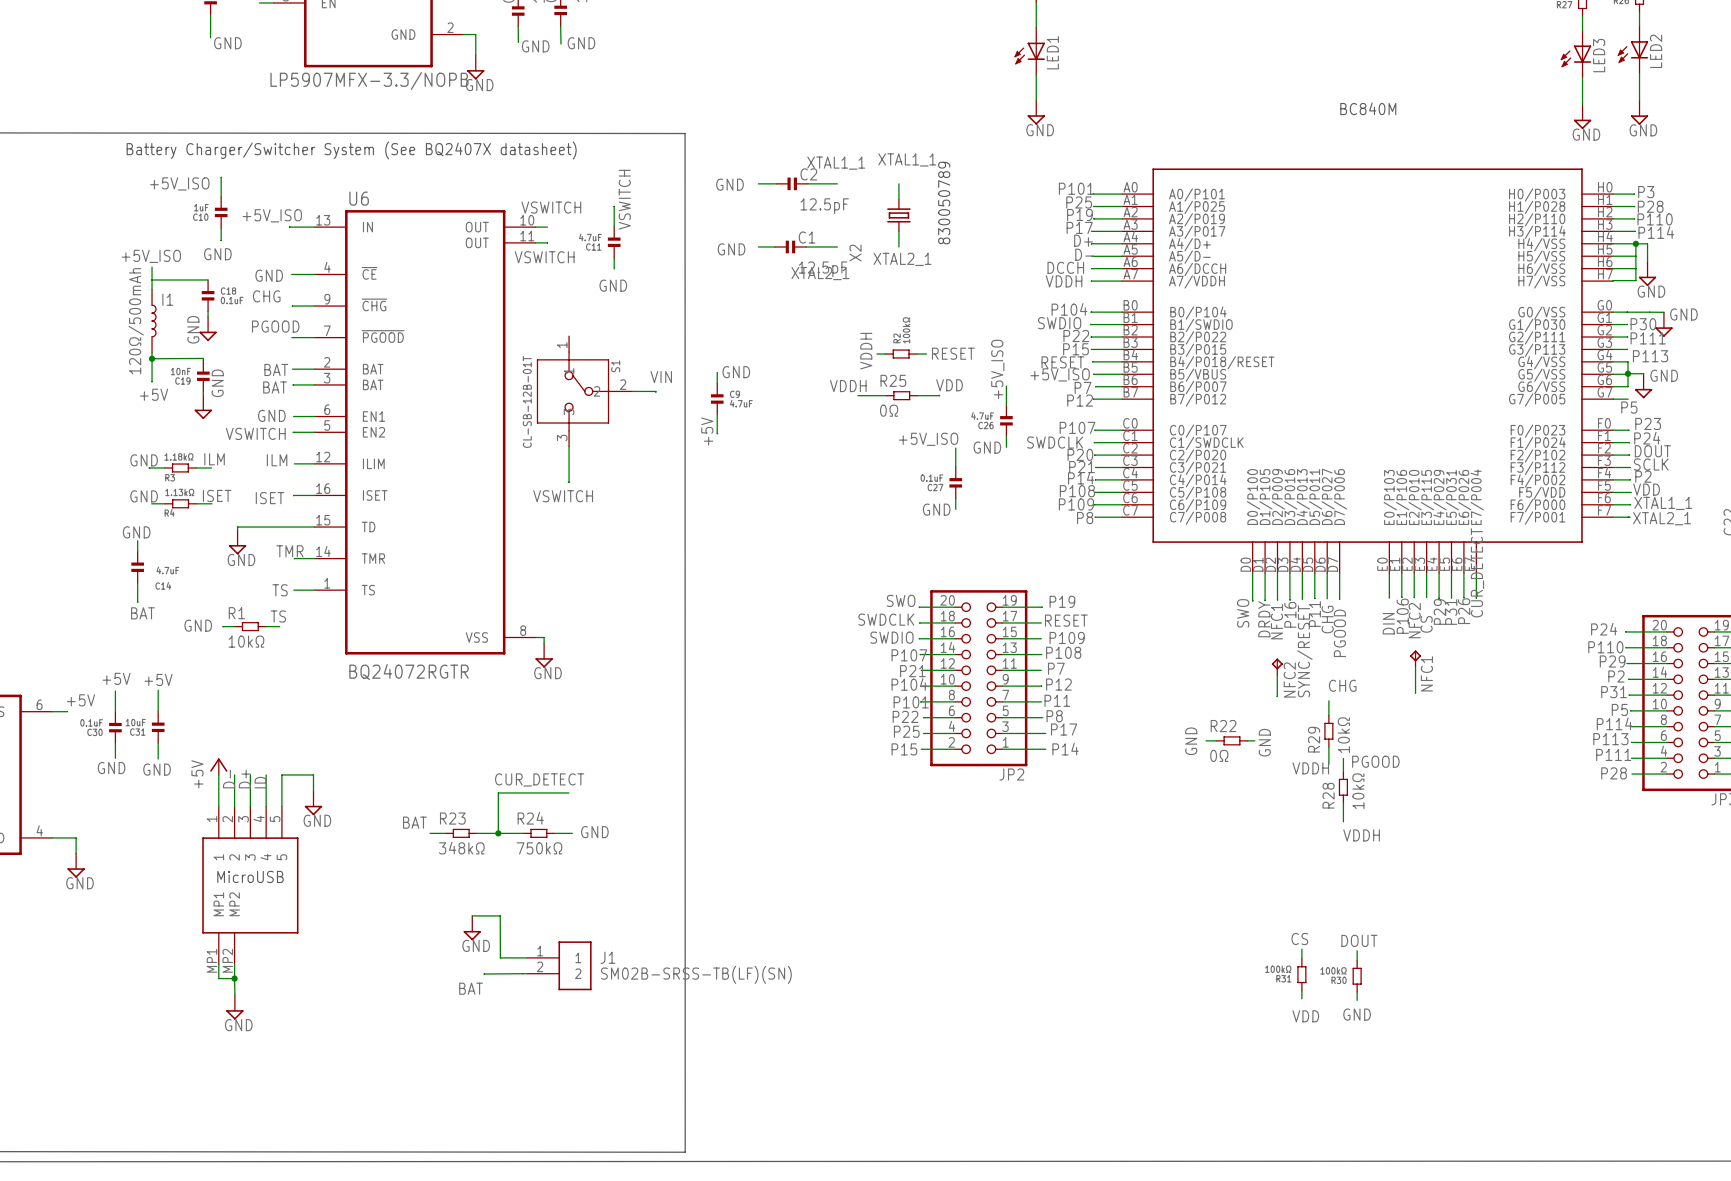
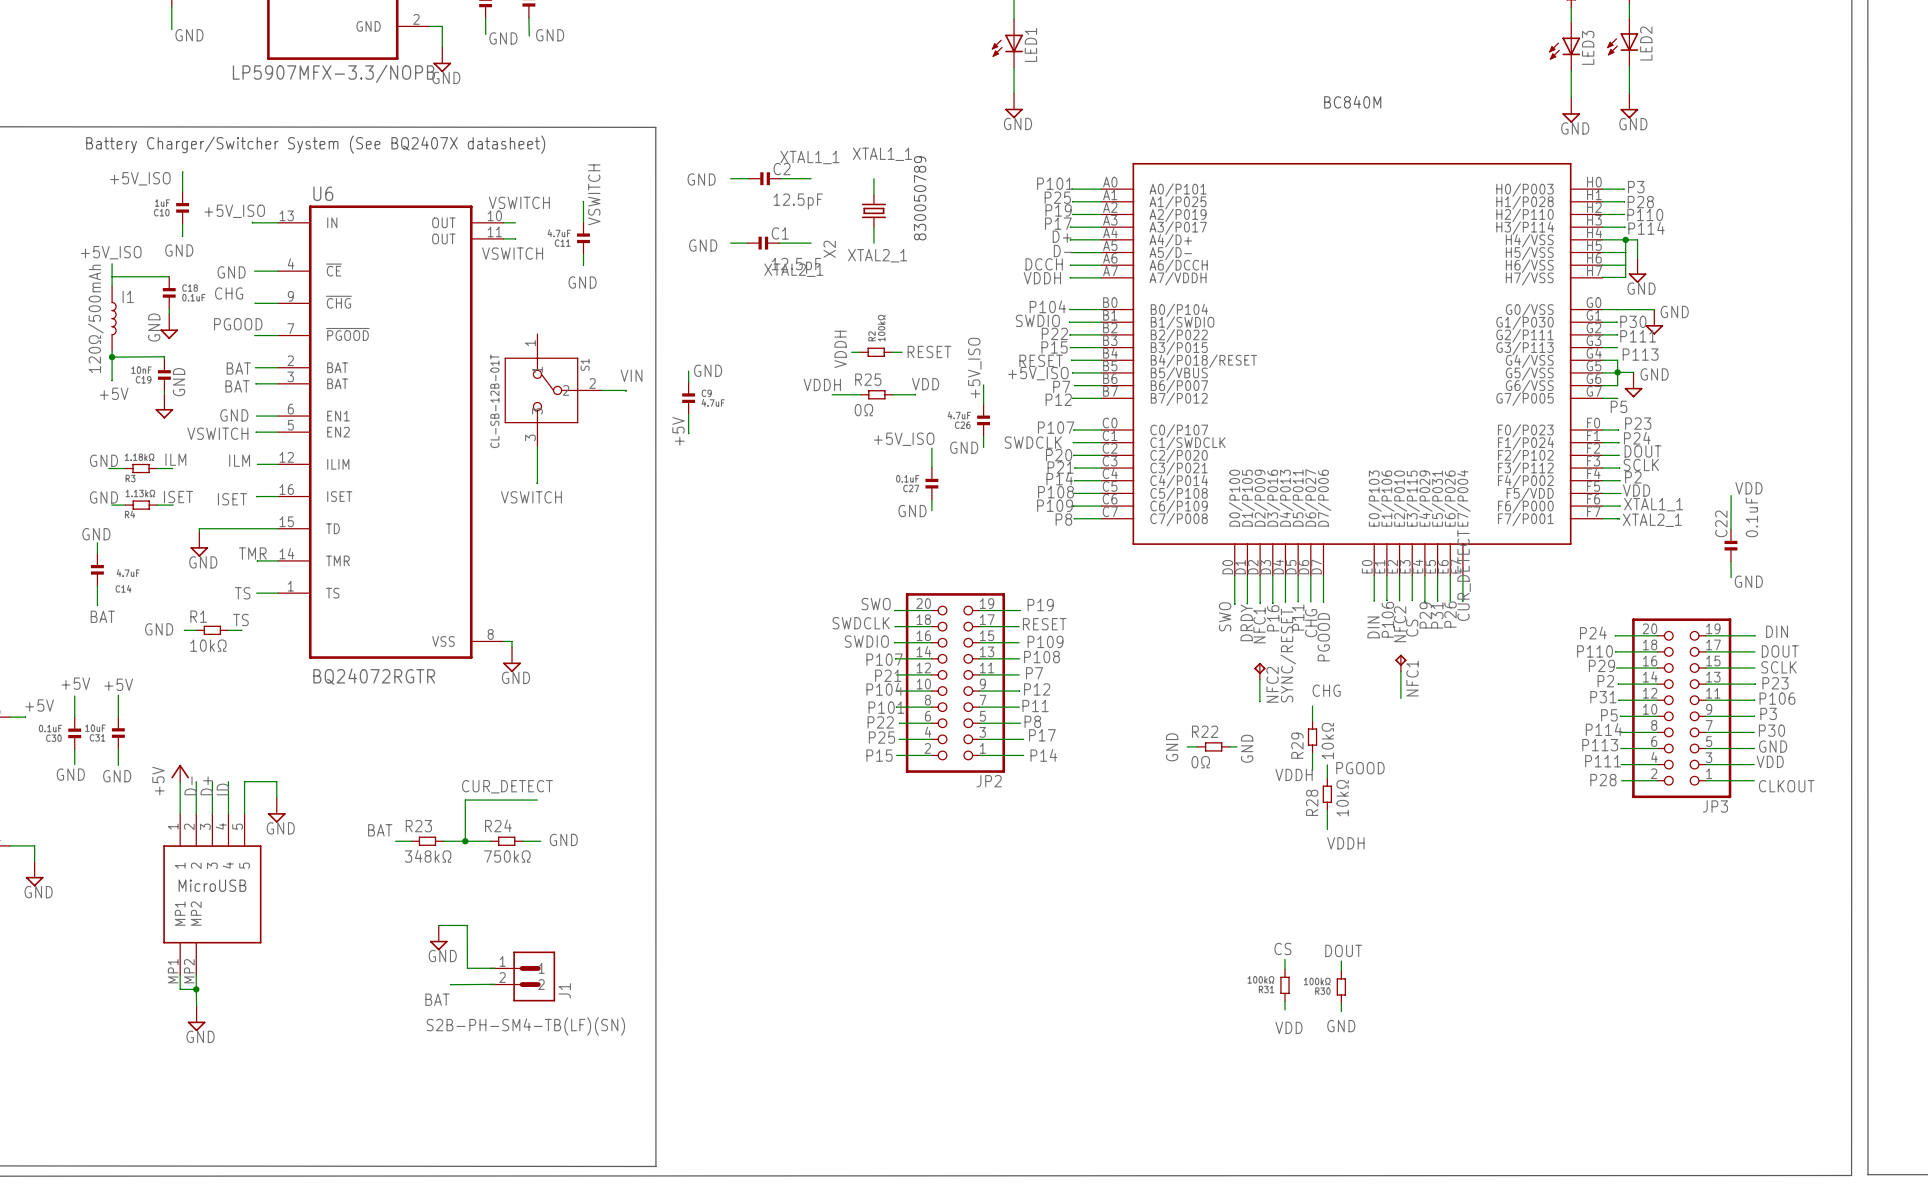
J1 symbol: [527, 941, 592, 991] -> [489, 951, 556, 1002]
J1 name position: J1 (608, 957) -> J1 (564, 990)
J1 value: SM02B-SRSS-TB(LF)(SN) (696, 974) -> S2B-PH-SM4-TB(LF)(SN) (525, 1026)

